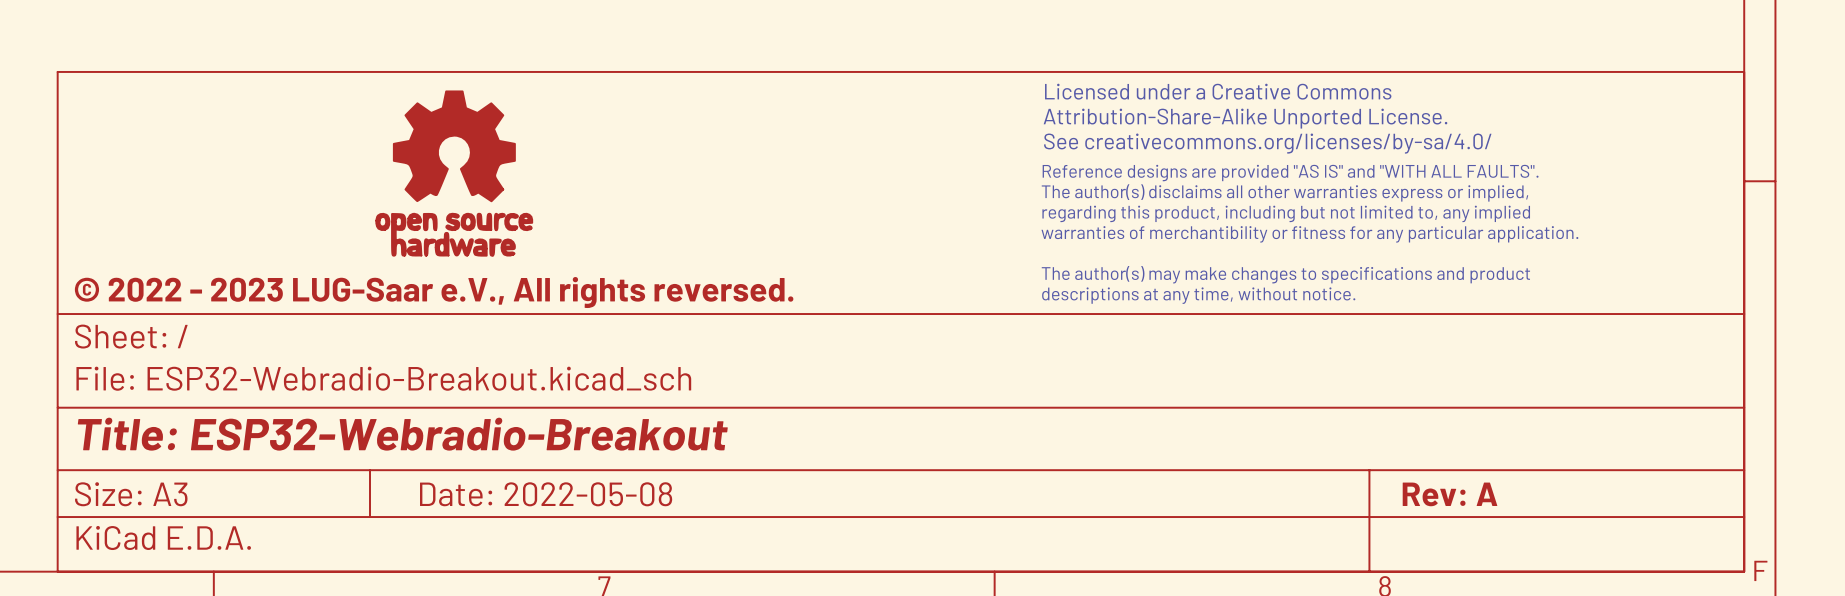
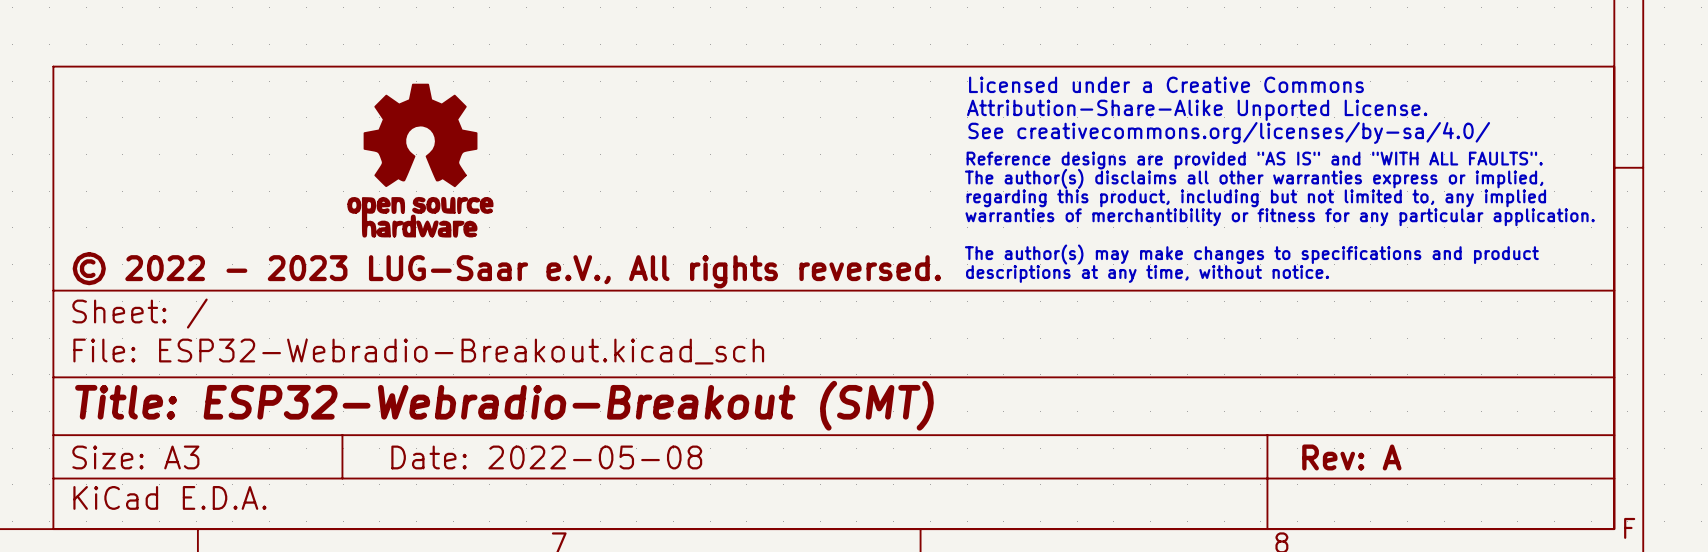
title block: Title: ESP32-Webradio-Breakout (402, 434) -> Title: ESP32-Webradio-Breakout (SMT) (504, 405)

